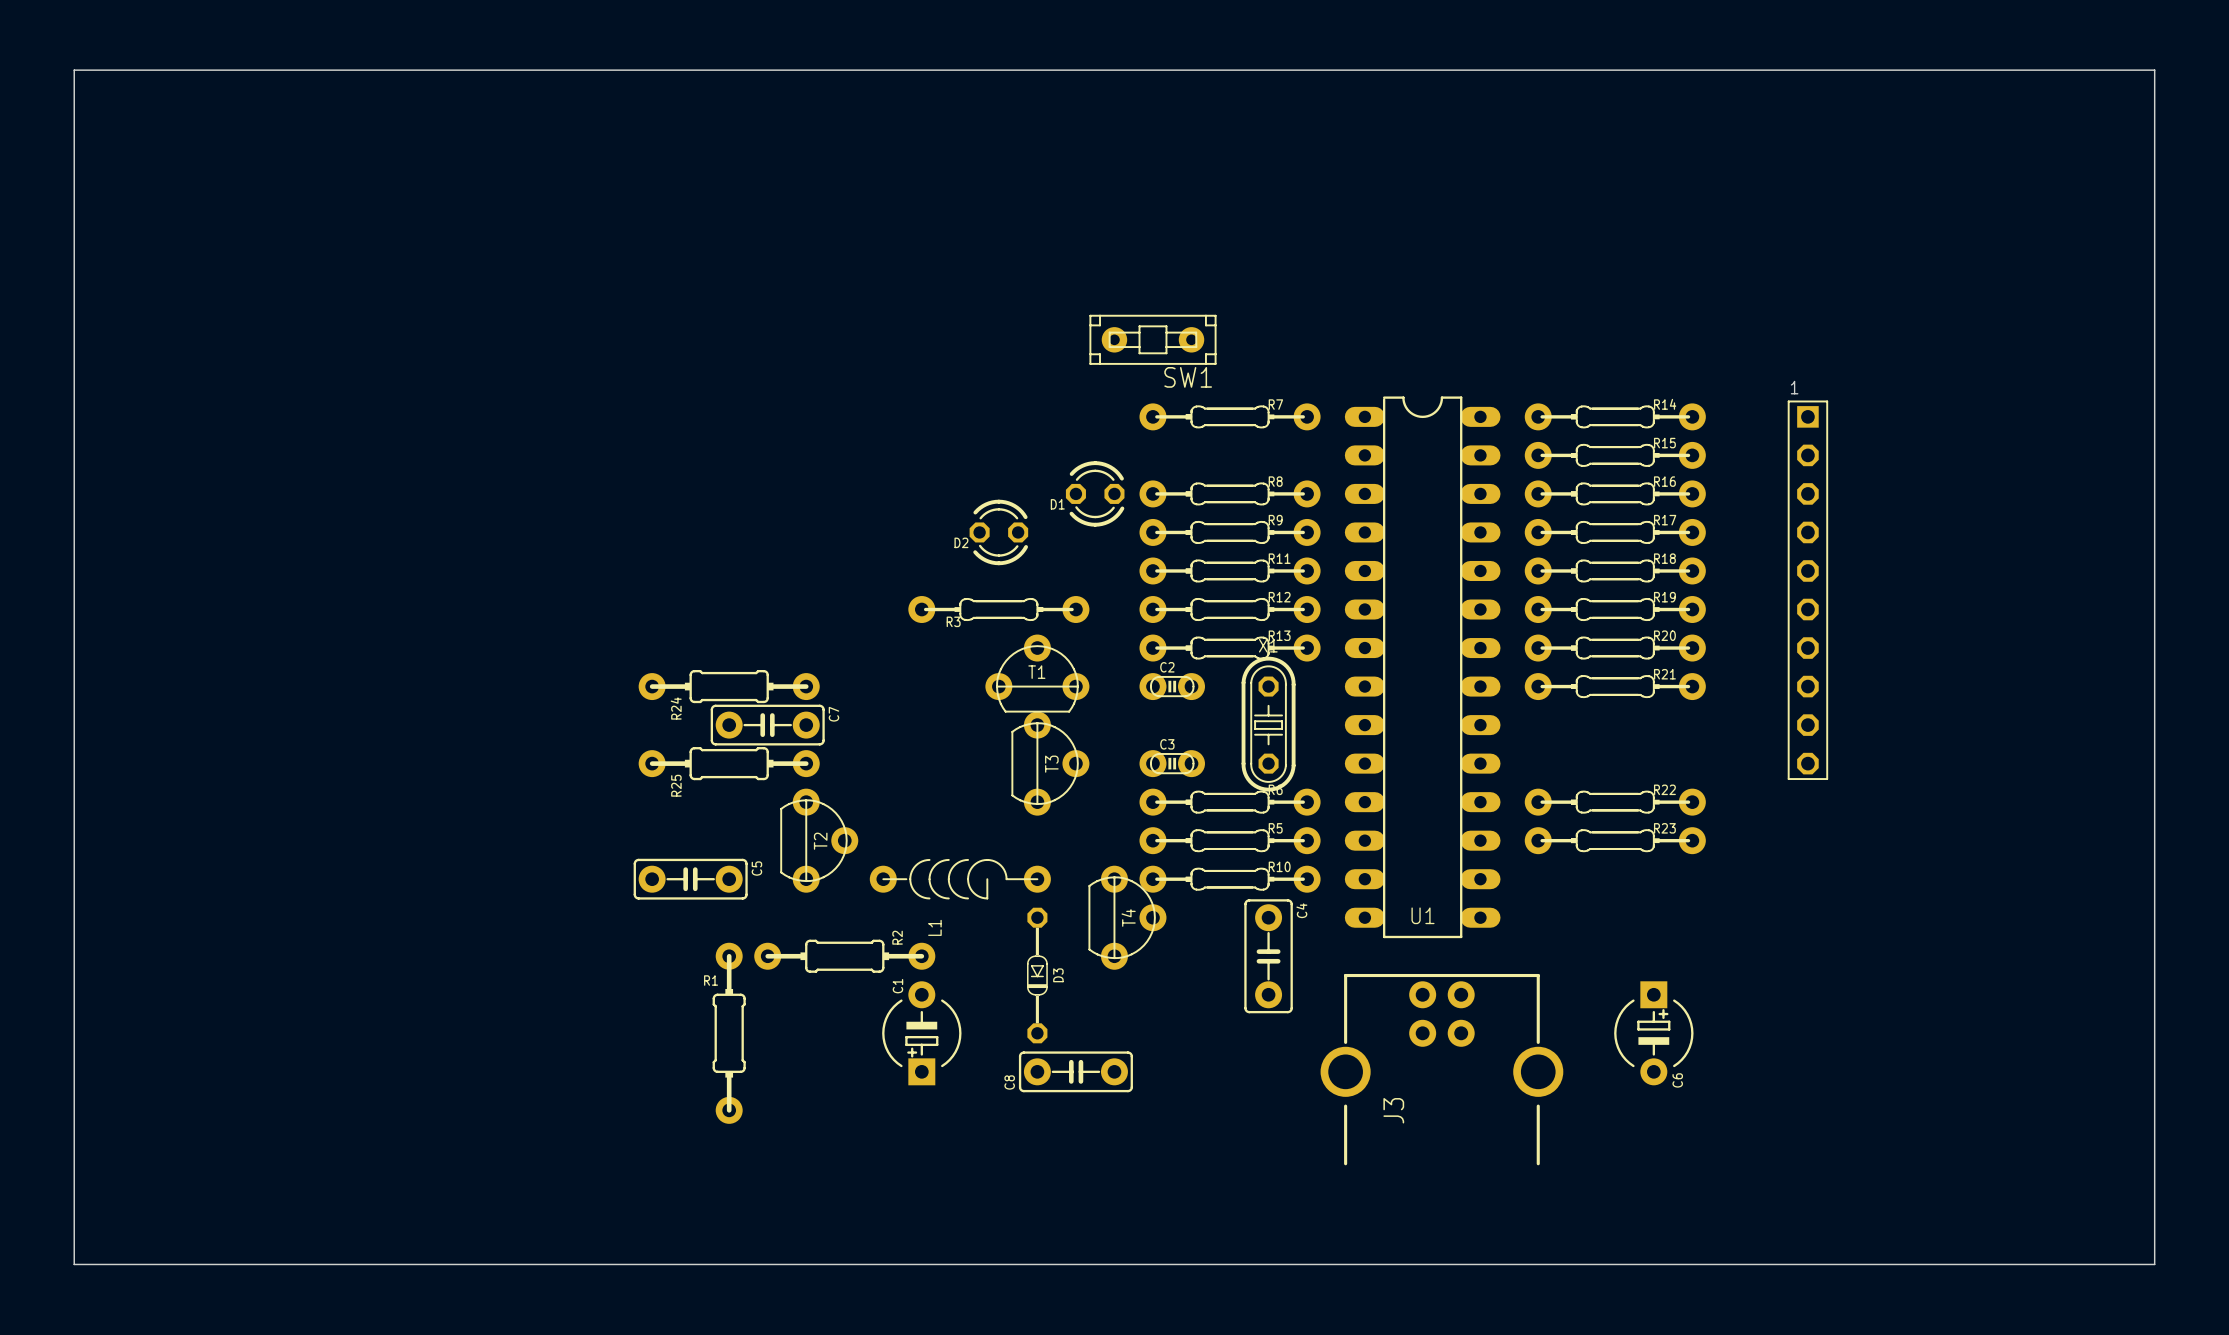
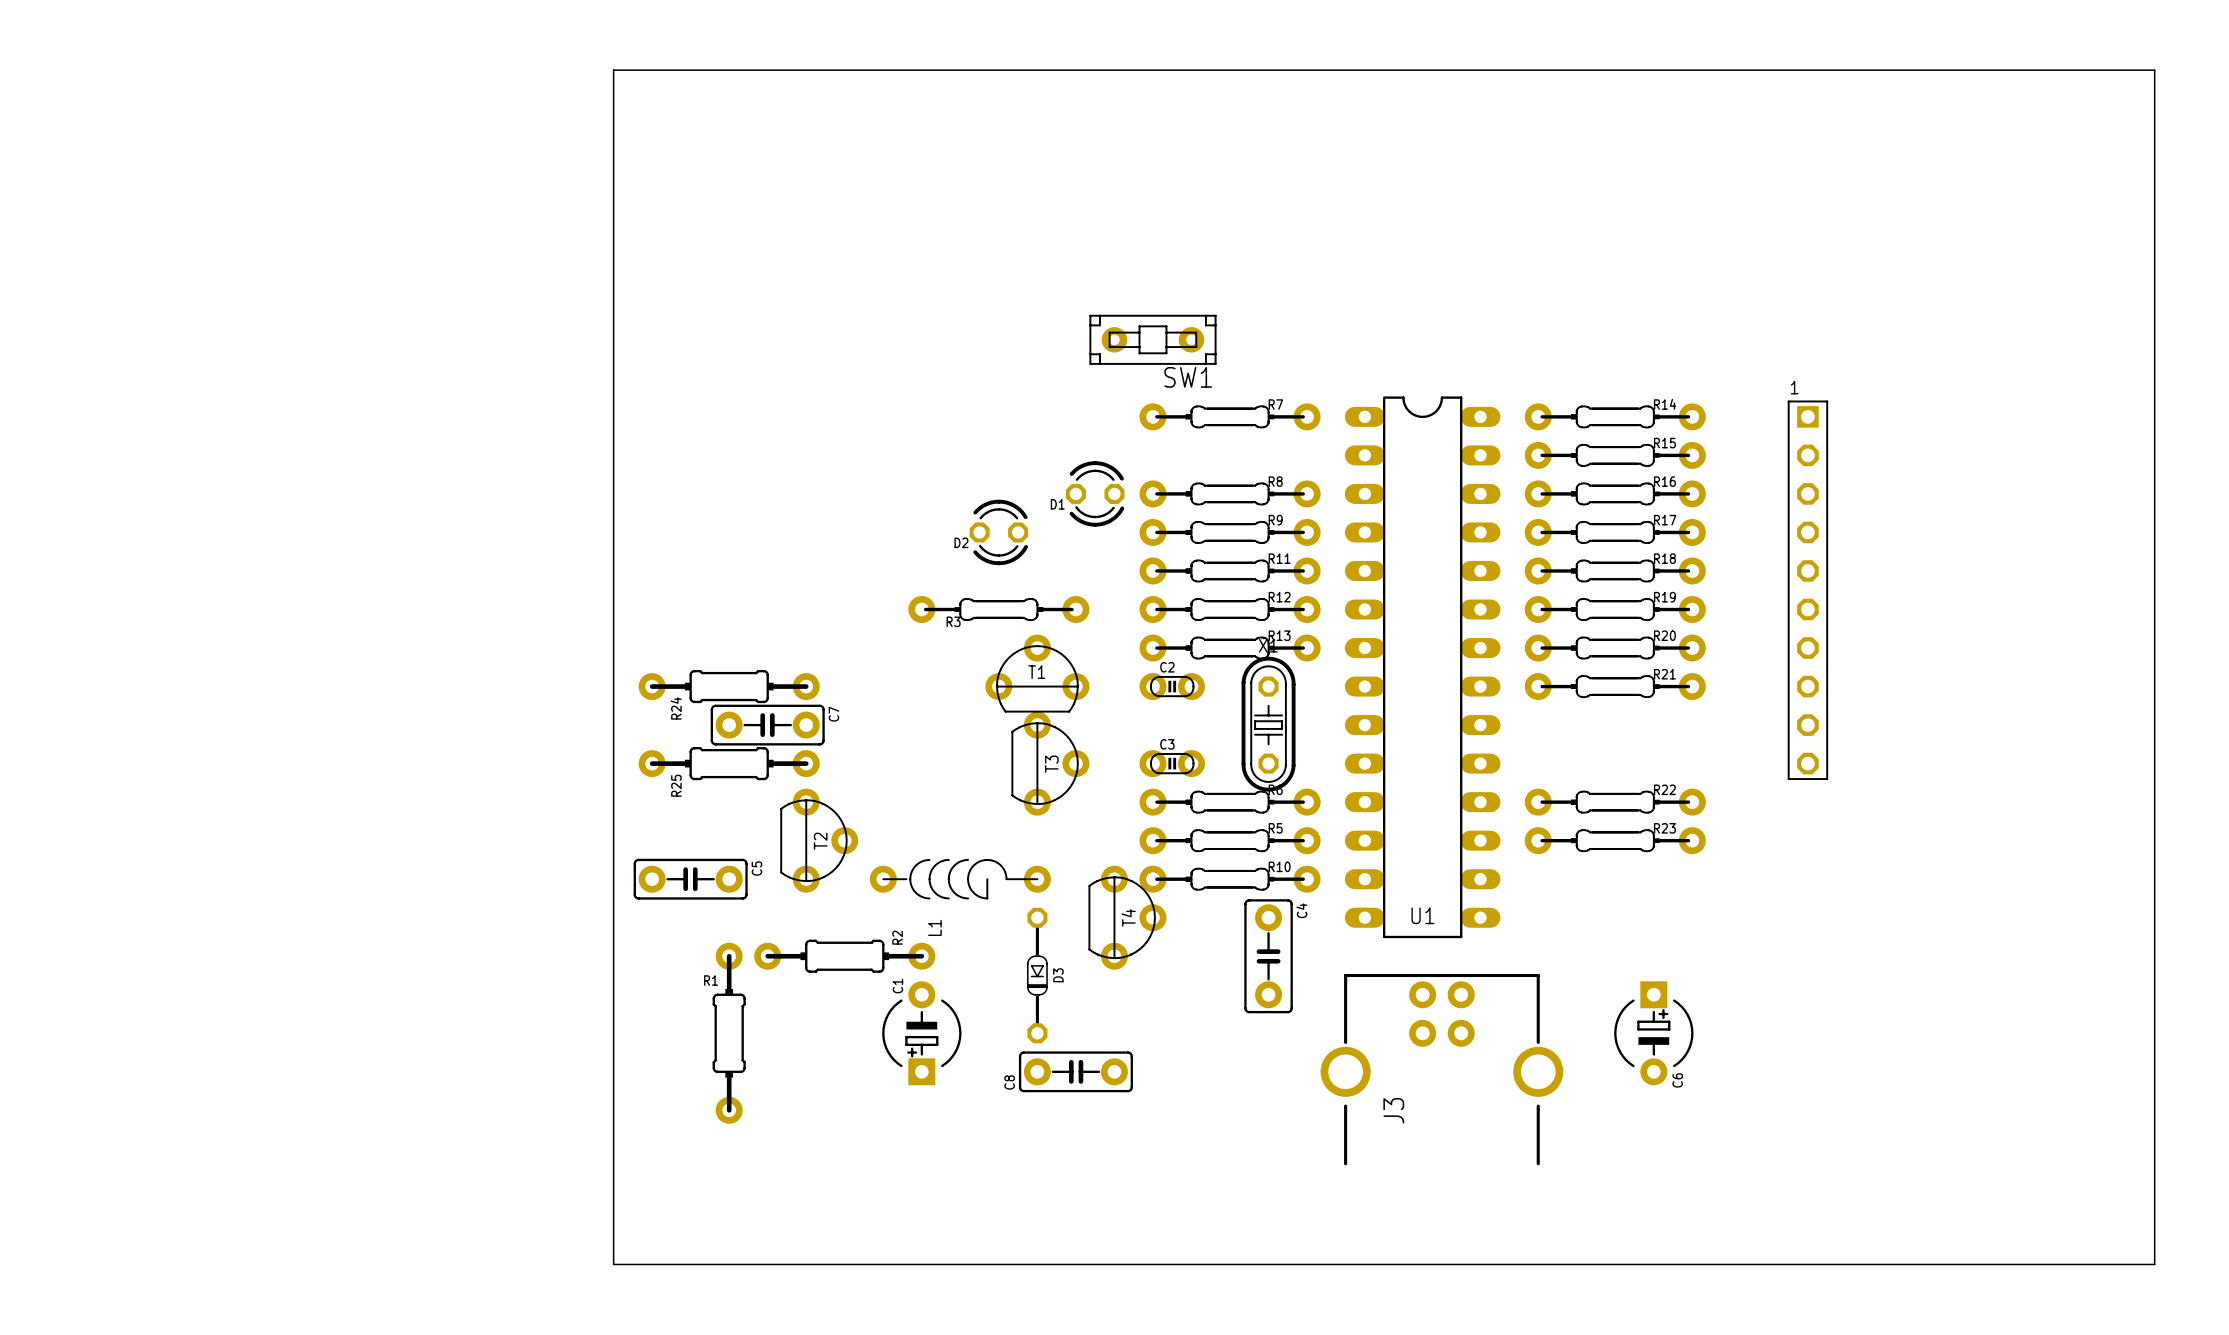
board edge: (613, 70) (74, 70) (74, 1264) (613, 1264) -> (613, 70) (613, 1264)

